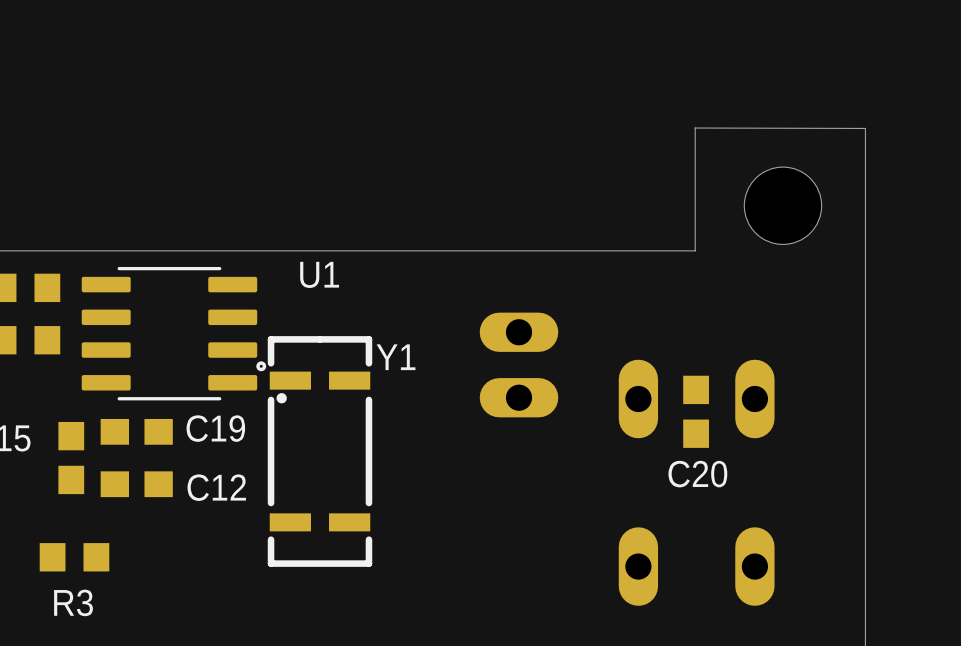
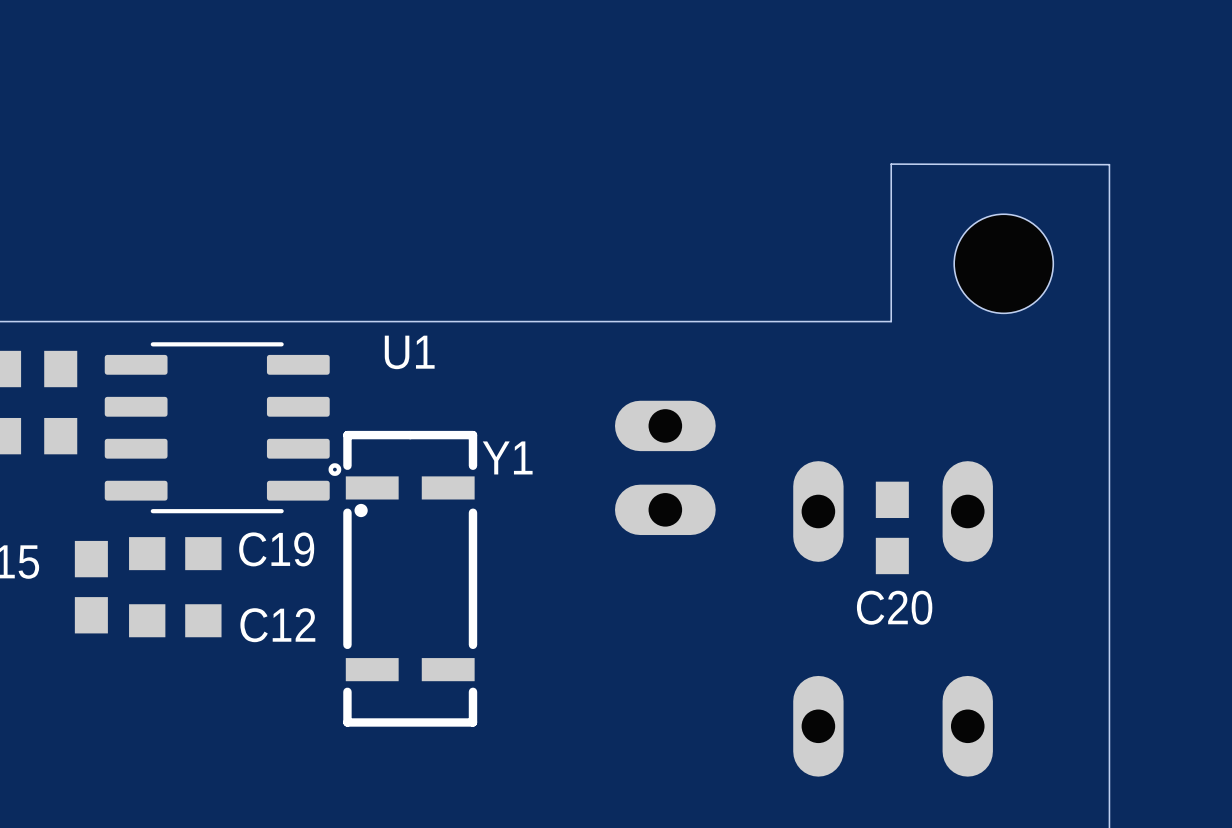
R3: (74, 557) -> none

